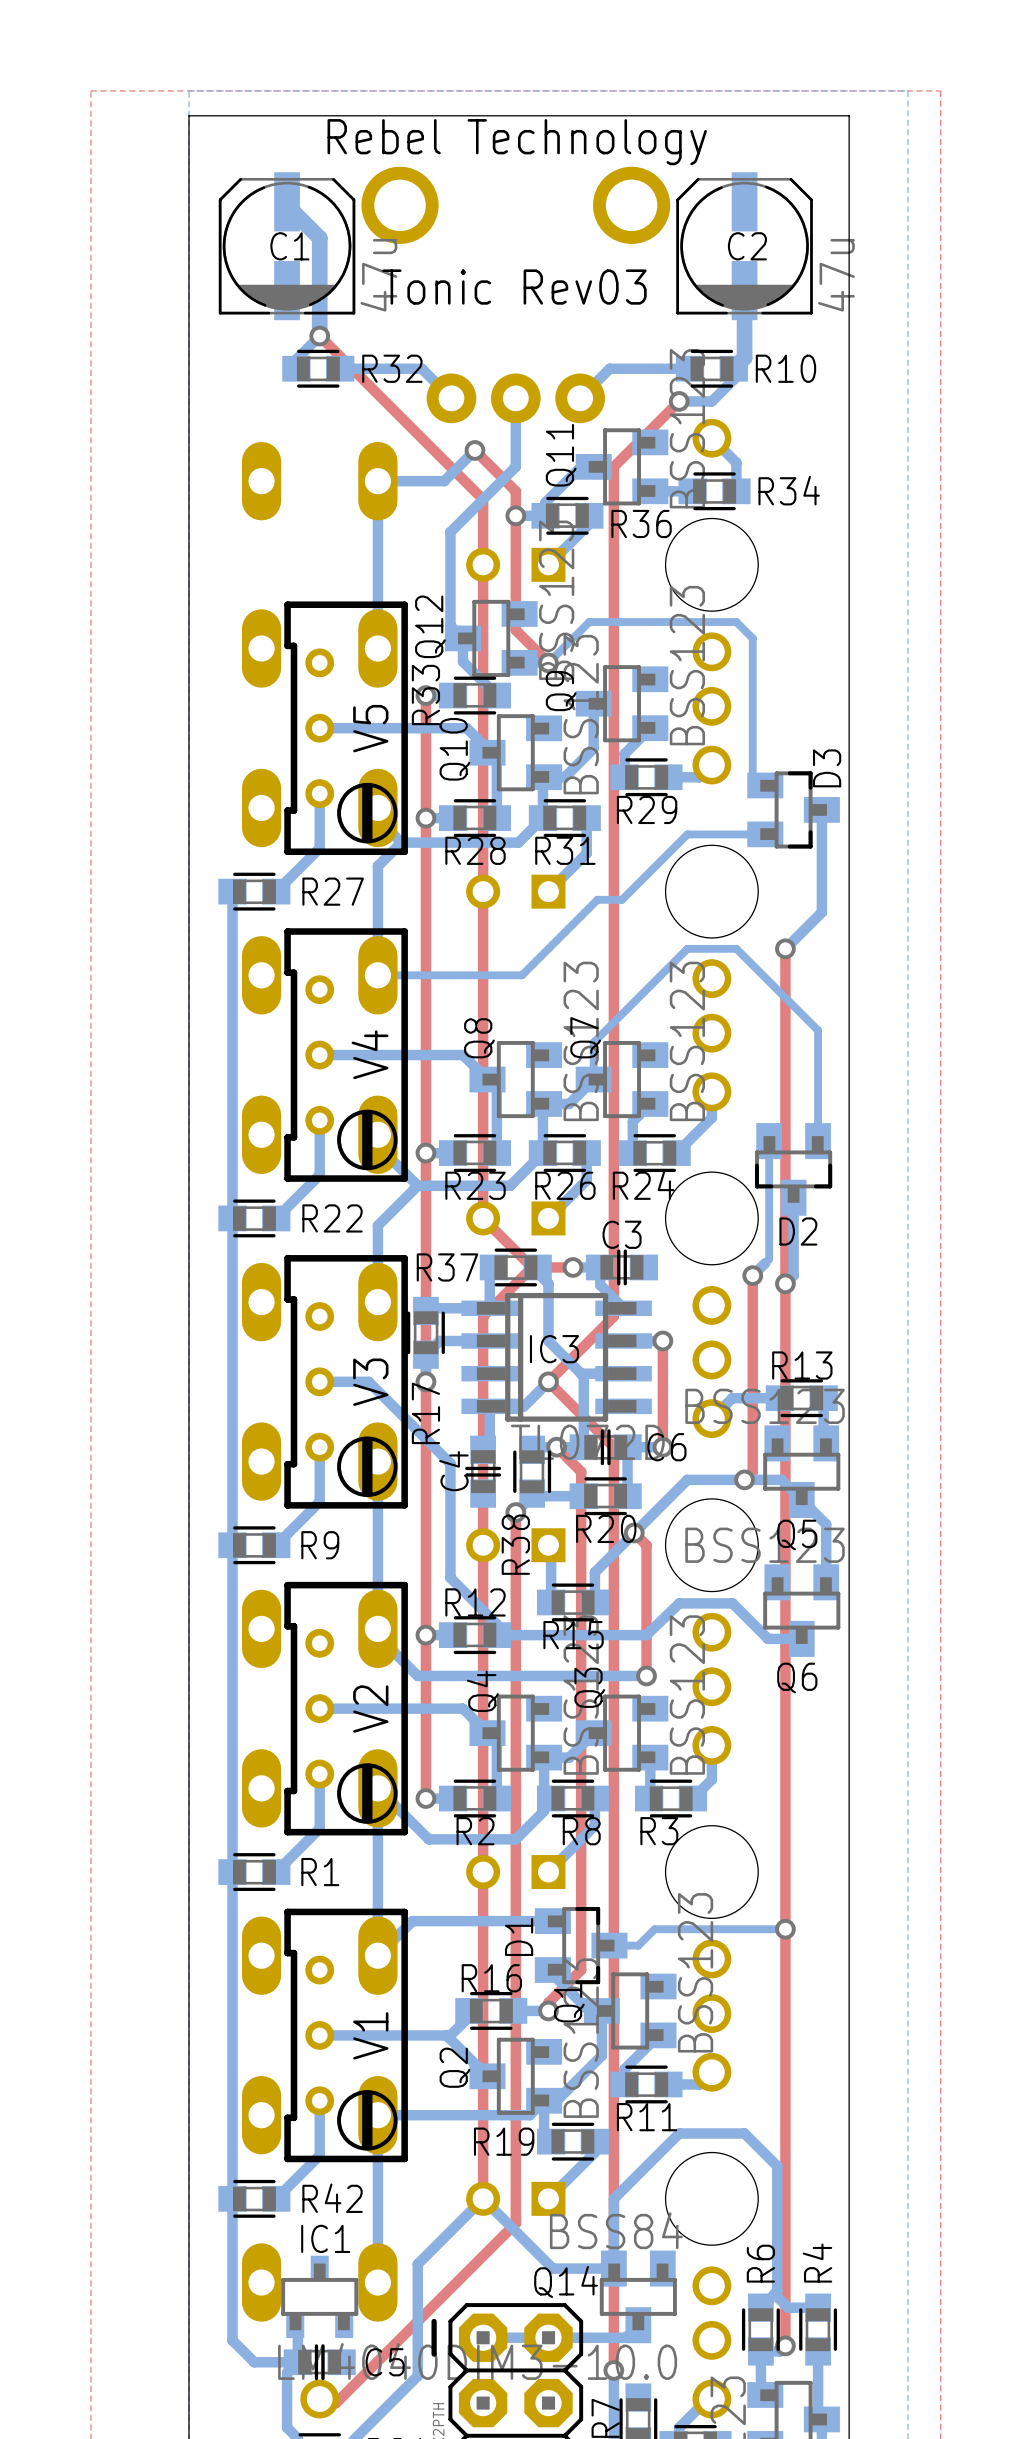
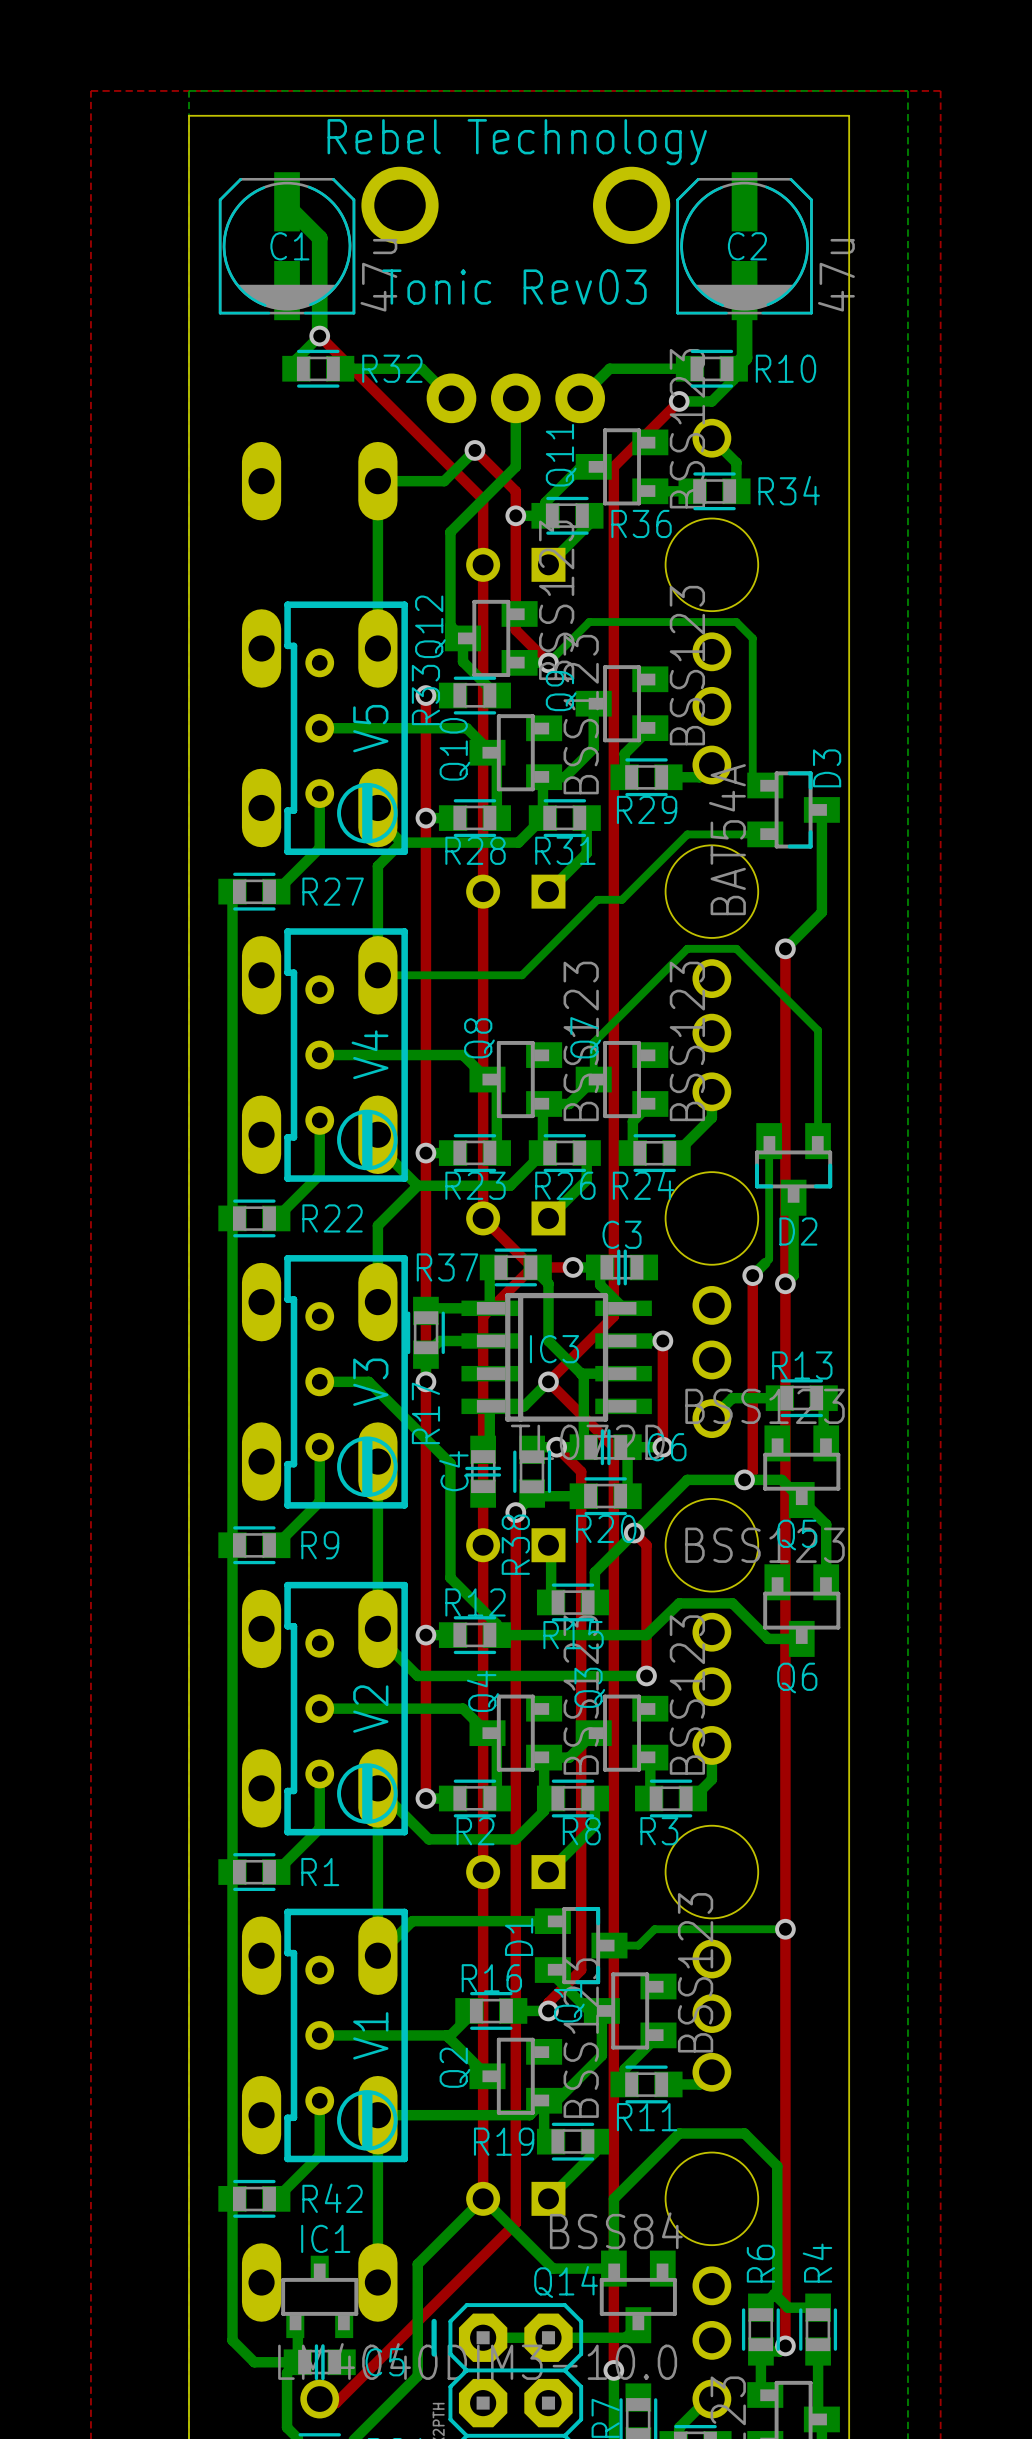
D3 value: none -> BAT54A (727, 839)

